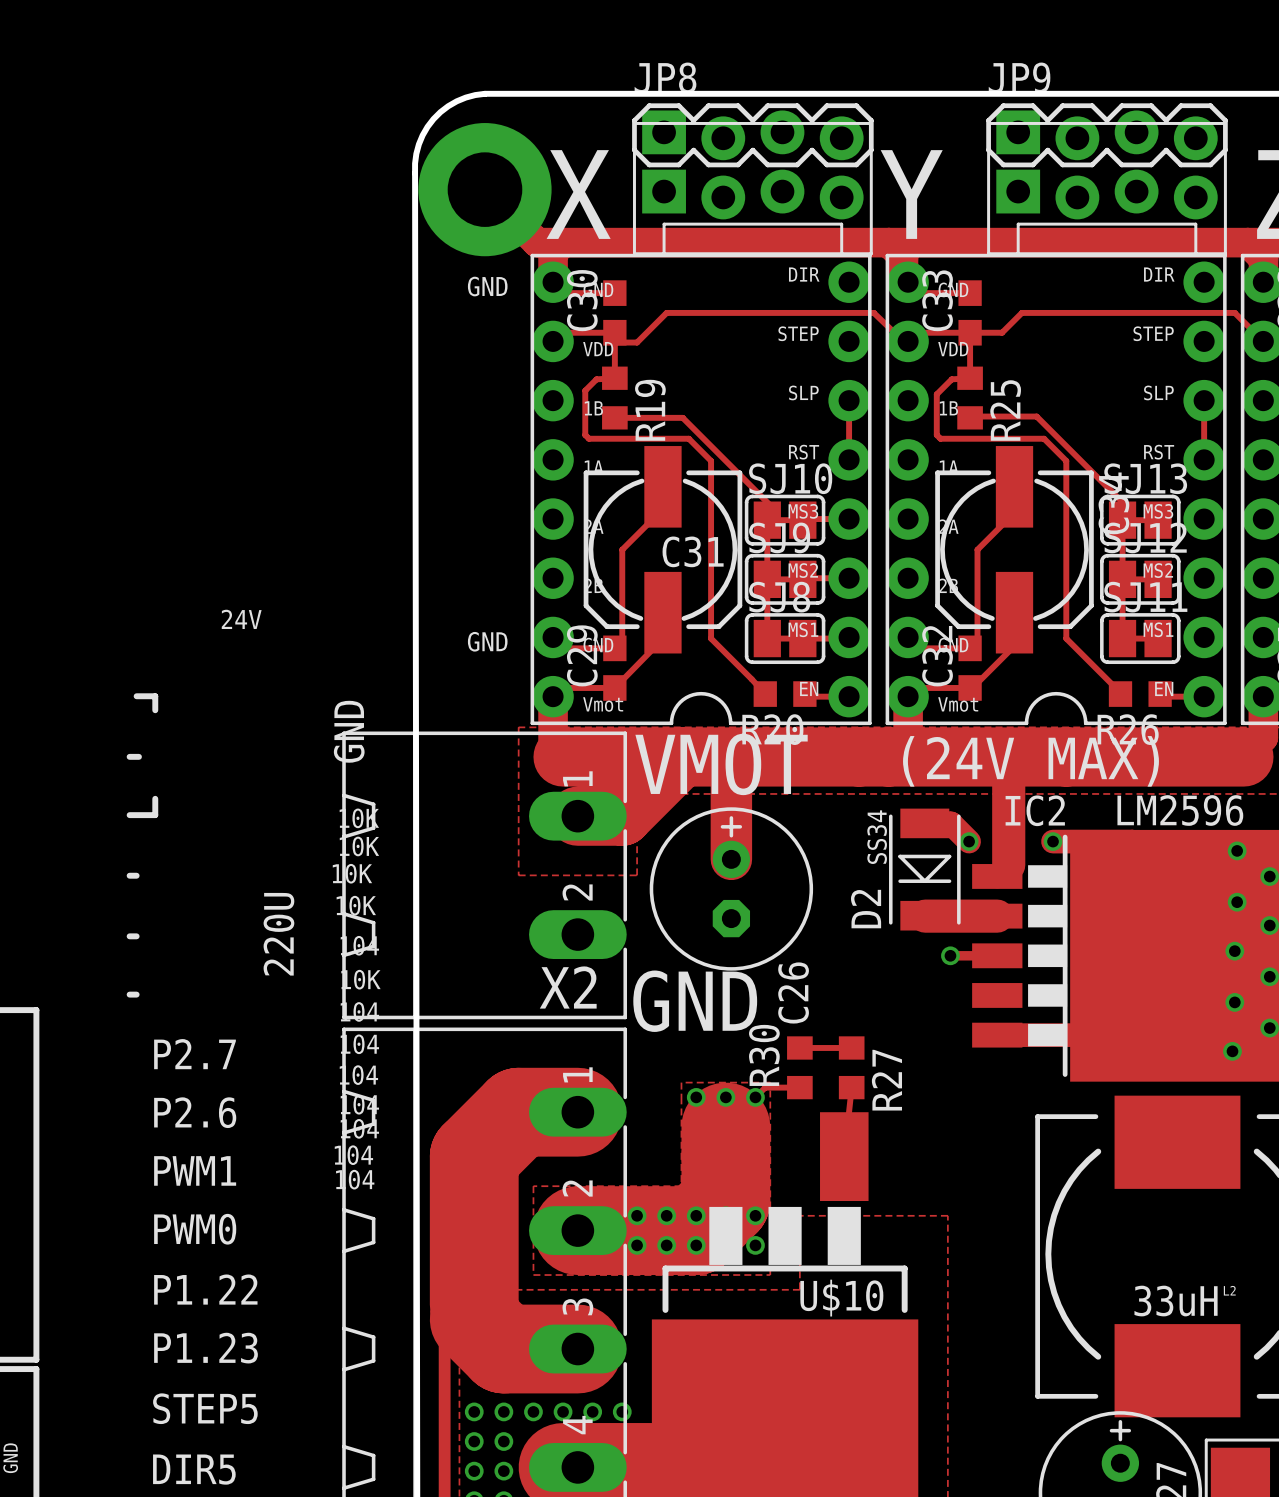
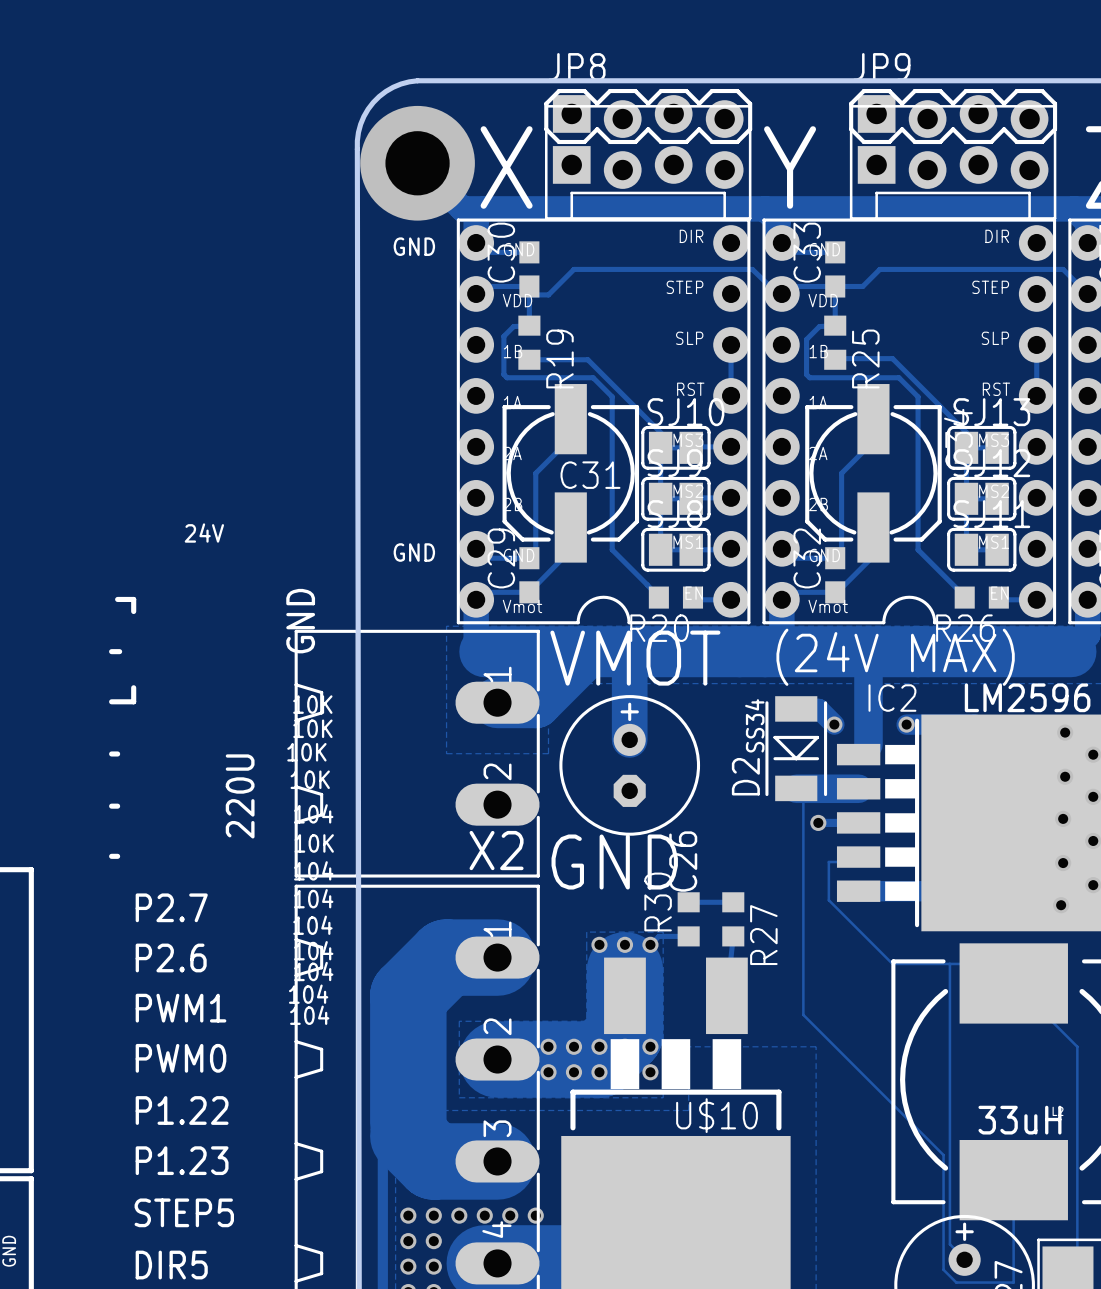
track: none -> (796, 788) (803, 798) (803, 1014) (943, 1155) (943, 1269) (956, 1282) (1013, 1282) (1013, 1180)
track: none -> (858, 857) (854, 862) (828, 862) (828, 900) (892, 963) (1000, 963) (1013, 983) (1077, 1046) (1077, 1263) (1067, 1271)
track: none -> (949, 963) (949, 1244) (964, 1259)

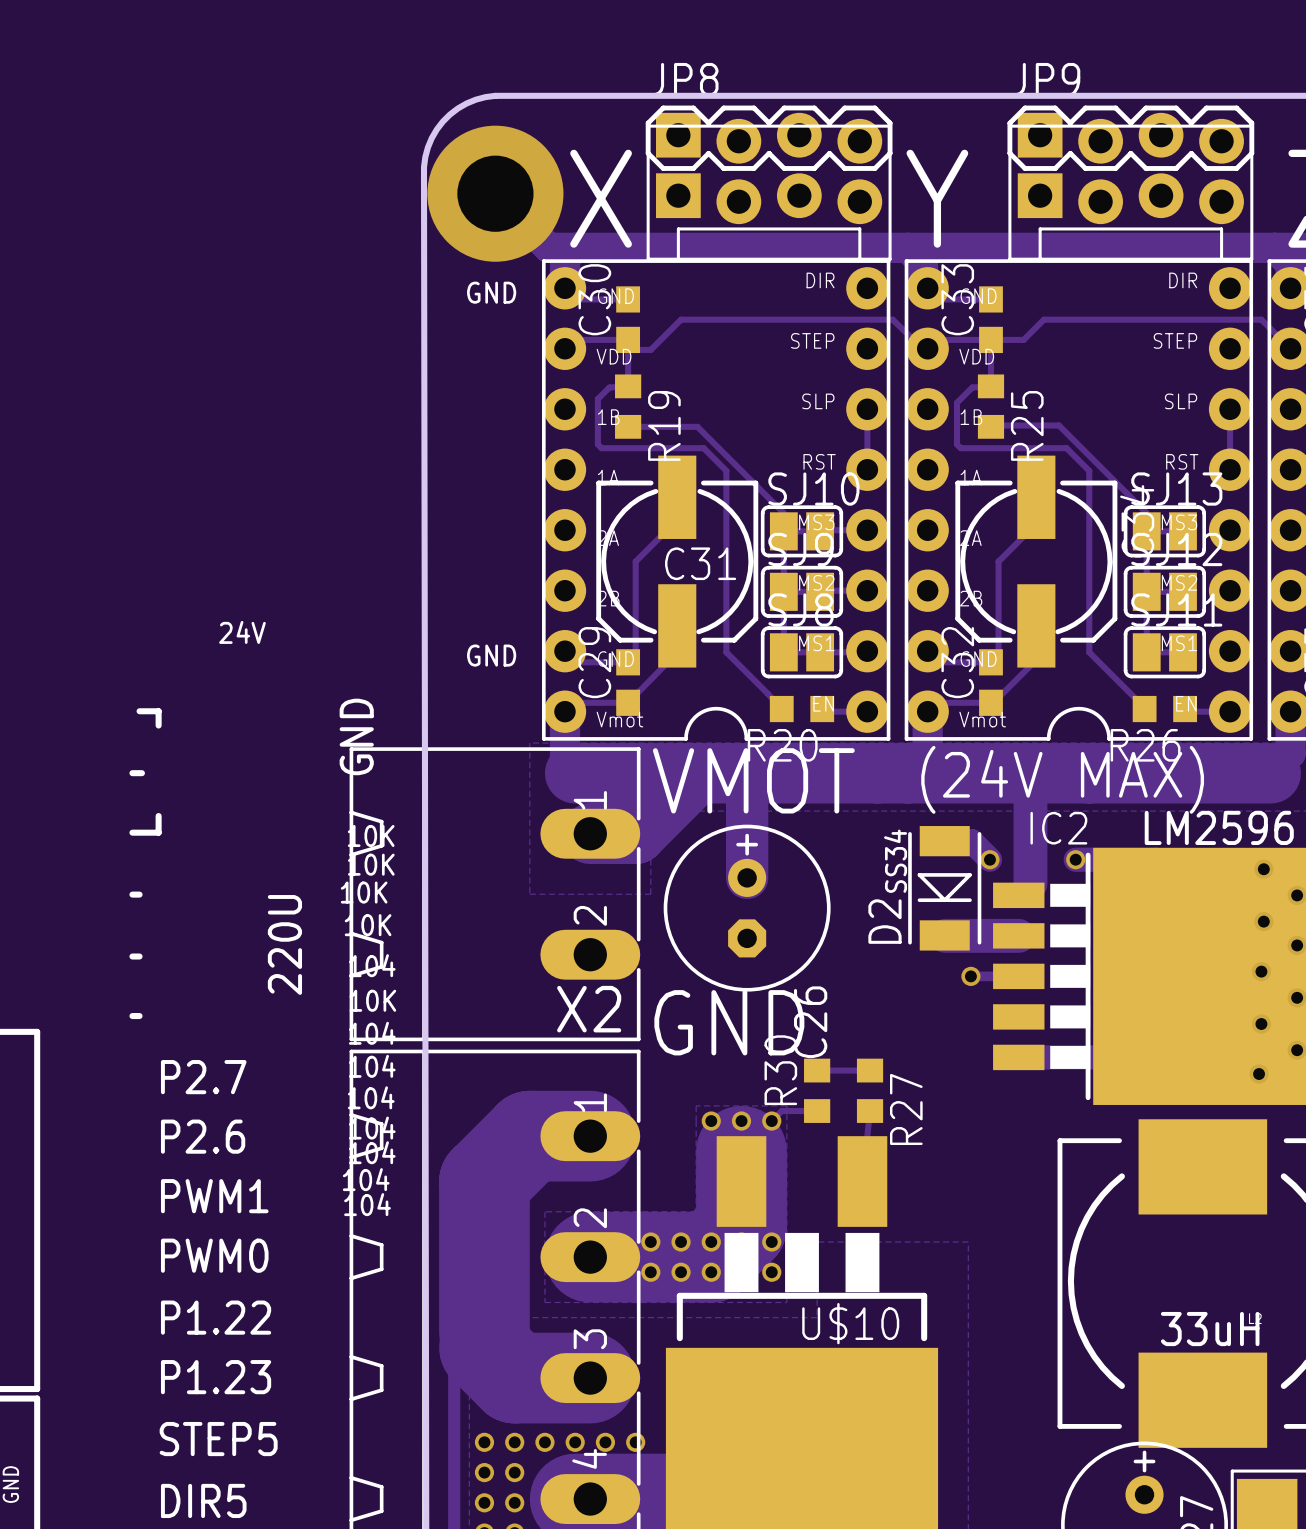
track: (796, 788) (803, 798) (803, 1014) (943, 1155) (943, 1269) (956, 1282) (1013, 1282) (1013, 1180) -> none
track: (858, 857) (854, 862) (828, 862) (828, 900) (892, 963) (1000, 963) (1013, 983) (1077, 1046) (1077, 1263) (1067, 1271) -> none
track: (949, 963) (949, 1244) (964, 1259) -> none

